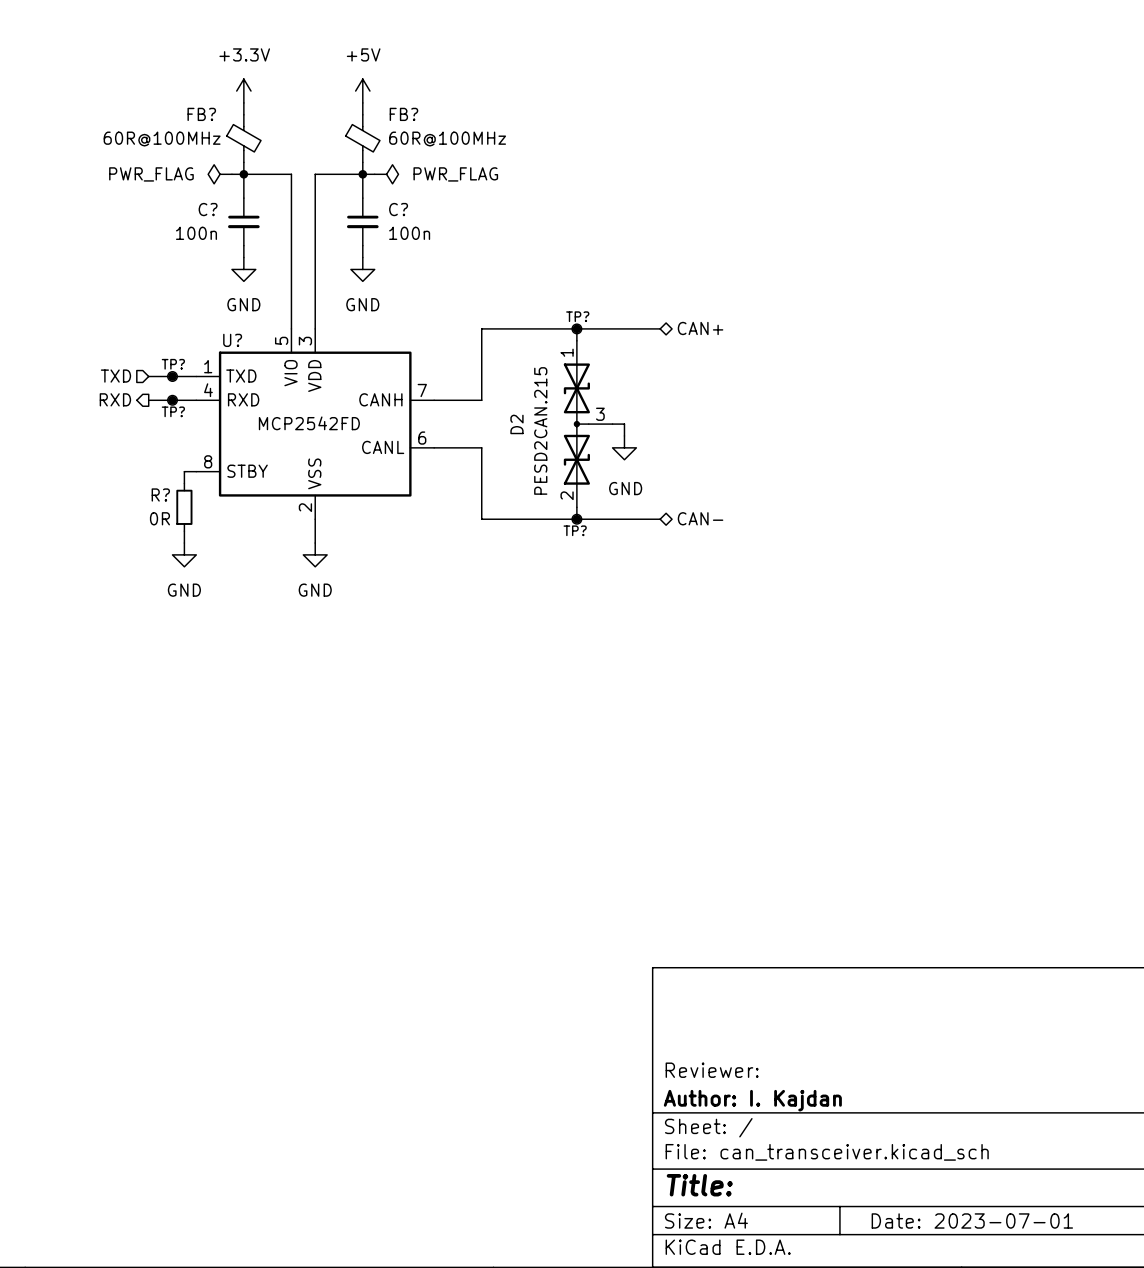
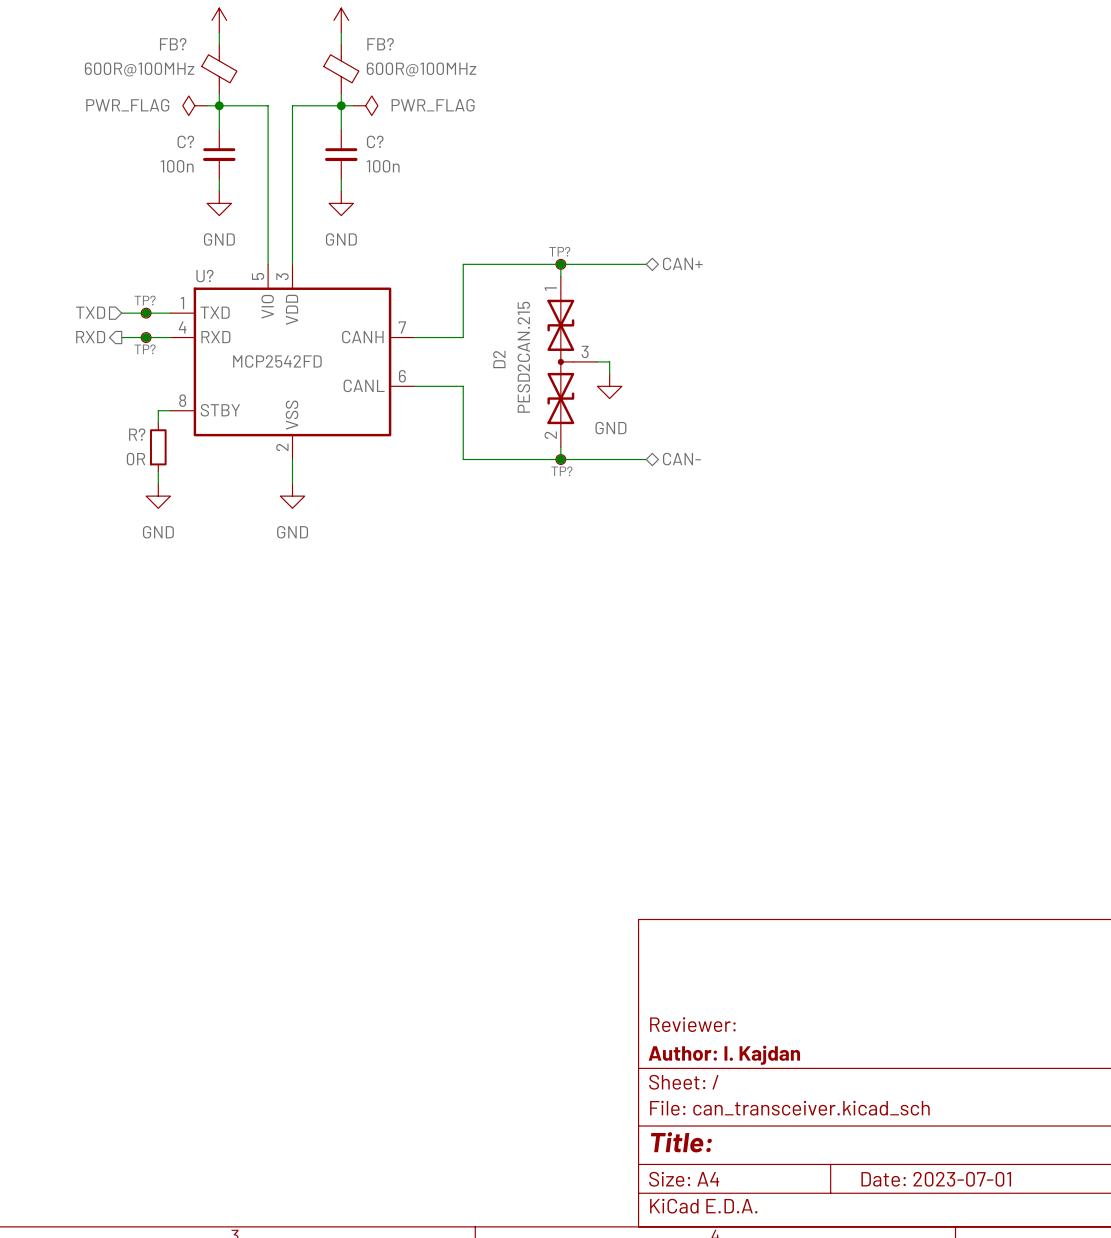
FB? value: 60R@100MHz (162, 139) -> 600R@100MHz (139, 69)
FB? value: 60R@100MHz (447, 139) -> 600R@100MHz (421, 69)

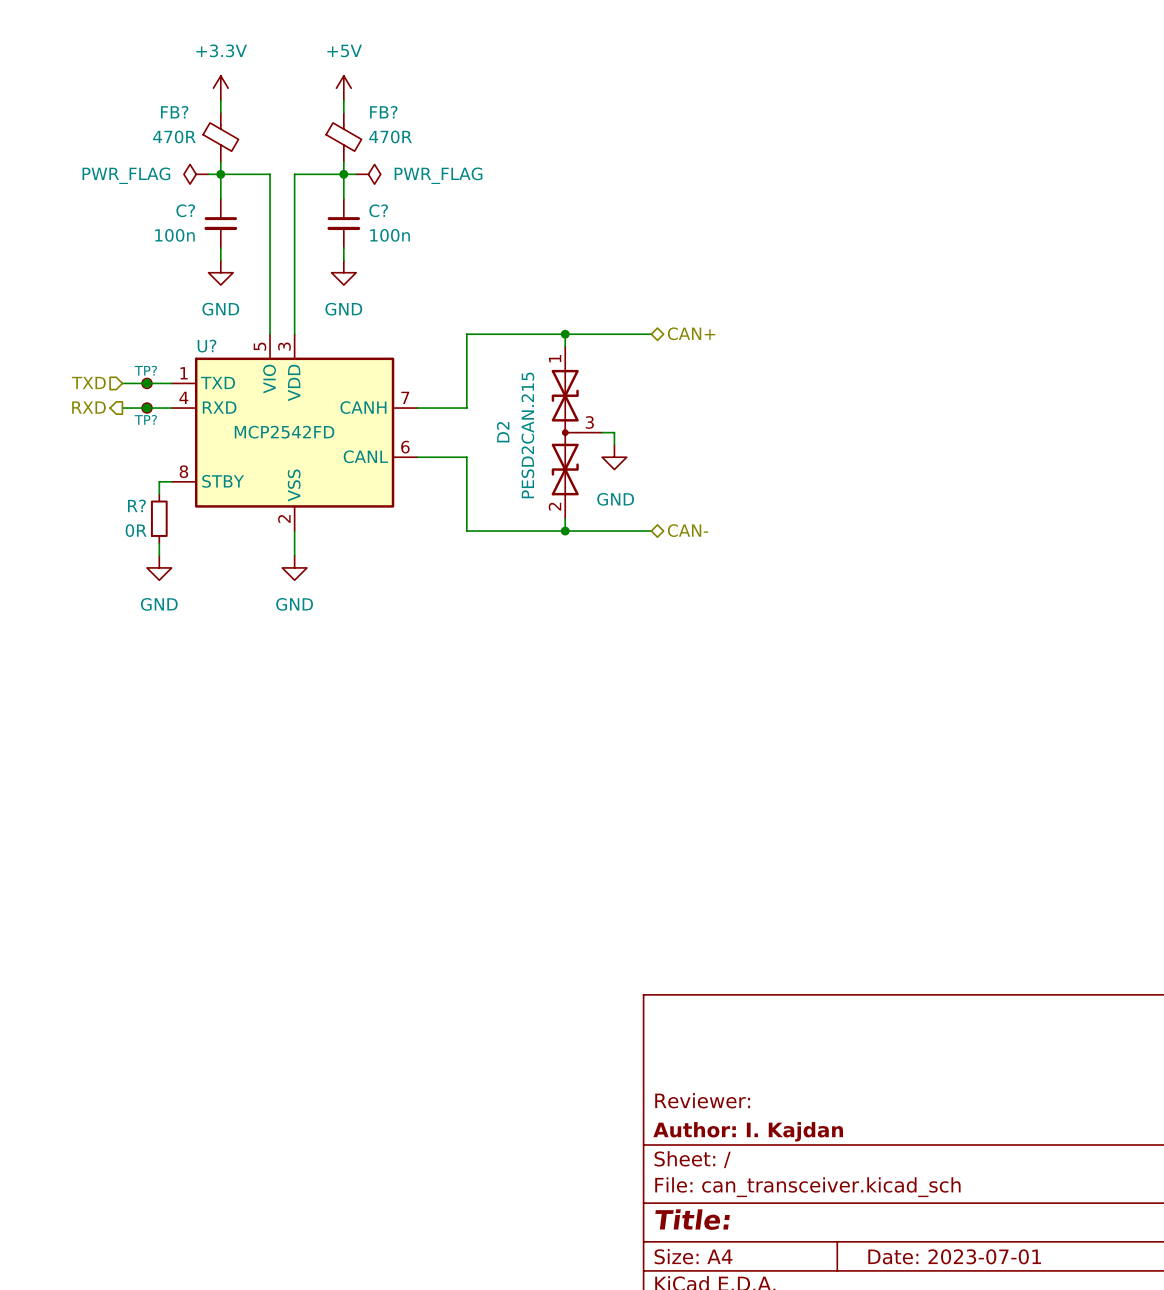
FB? value: 600R@100MHz (139, 69) -> 470R (174, 136)
FB? value: 600R@100MHz (421, 69) -> 470R (390, 136)
TP?: (560, 264) -> none
TP?: (560, 459) -> none

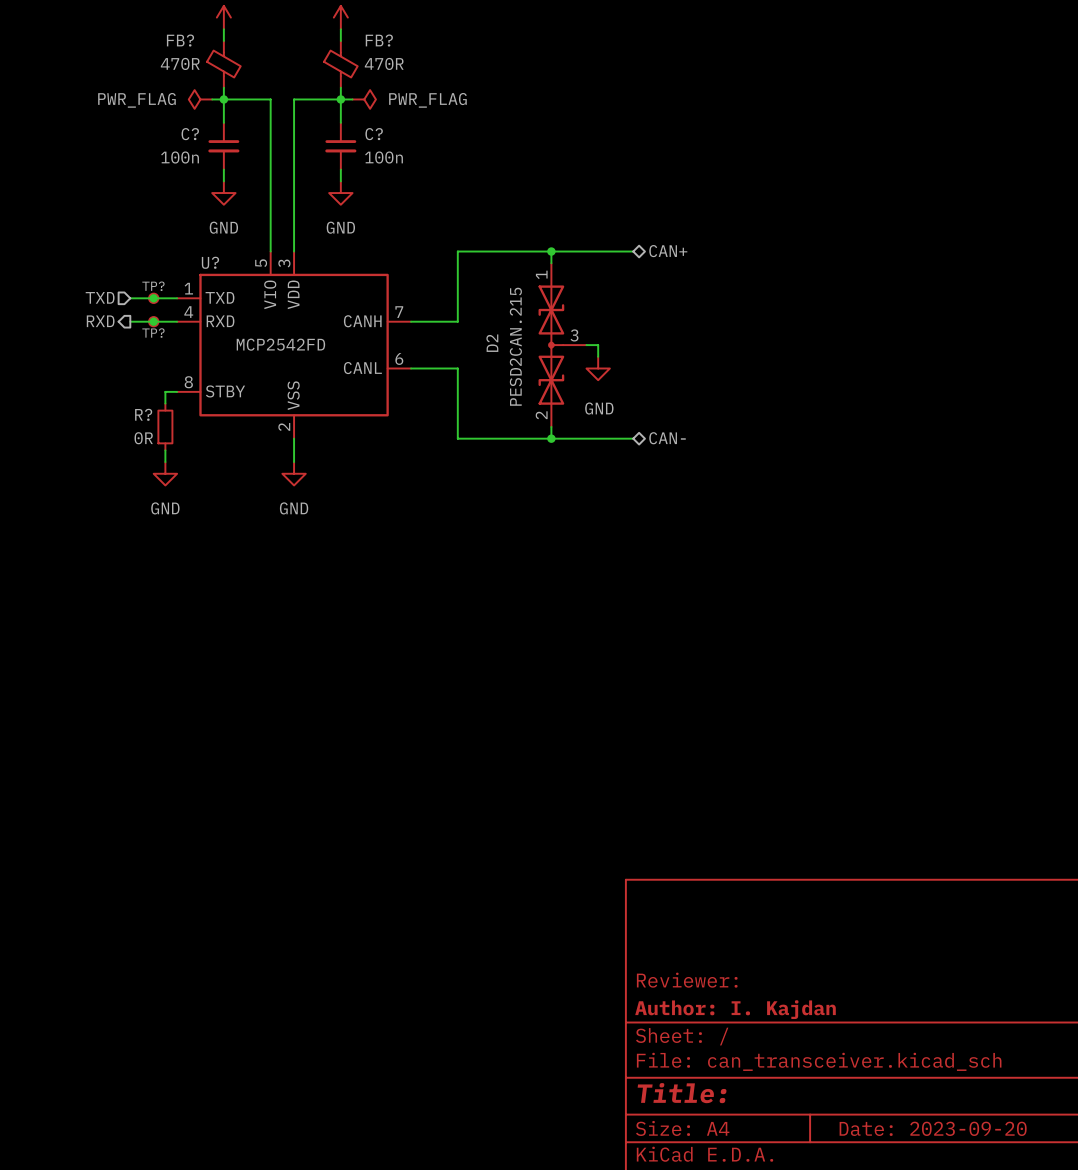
title block: Date: 2023-07-01 (954, 1256) -> Date: 2023-09-20 (933, 1128)

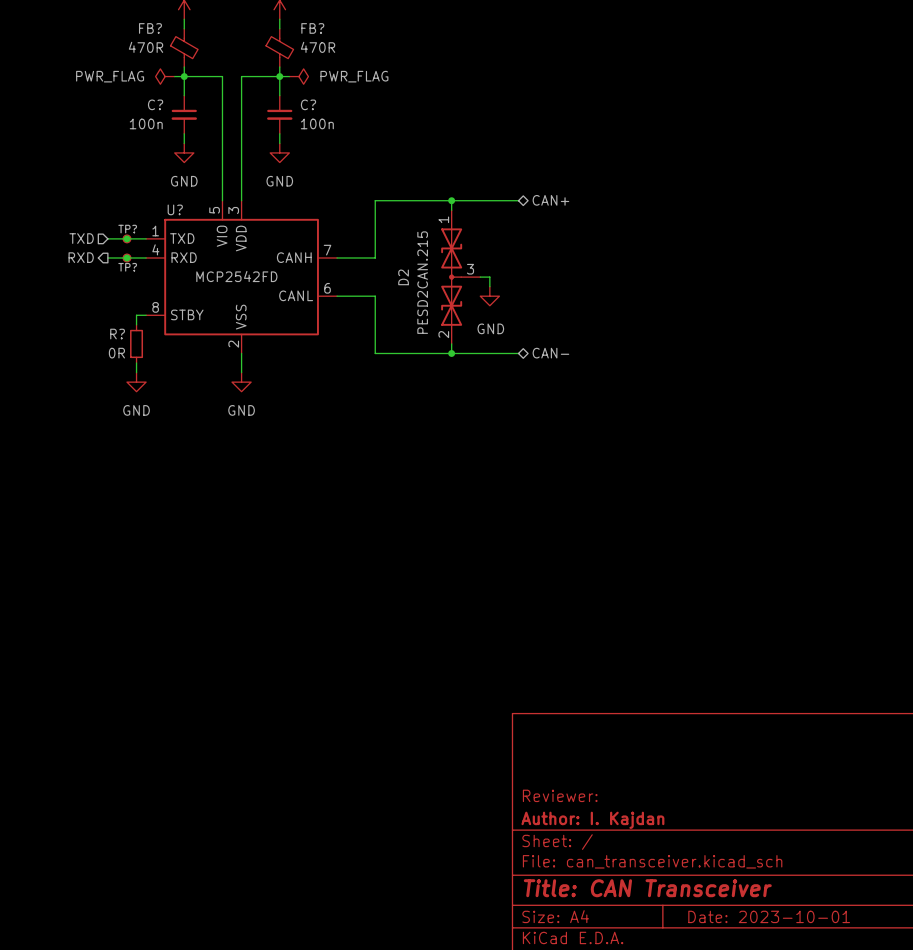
title block: Title: (682, 1093) -> Title: CAN Transceiver (647, 888)
title block: Date: 2023-09-20 (933, 1128) -> Date: 2023-10-01 (769, 916)

